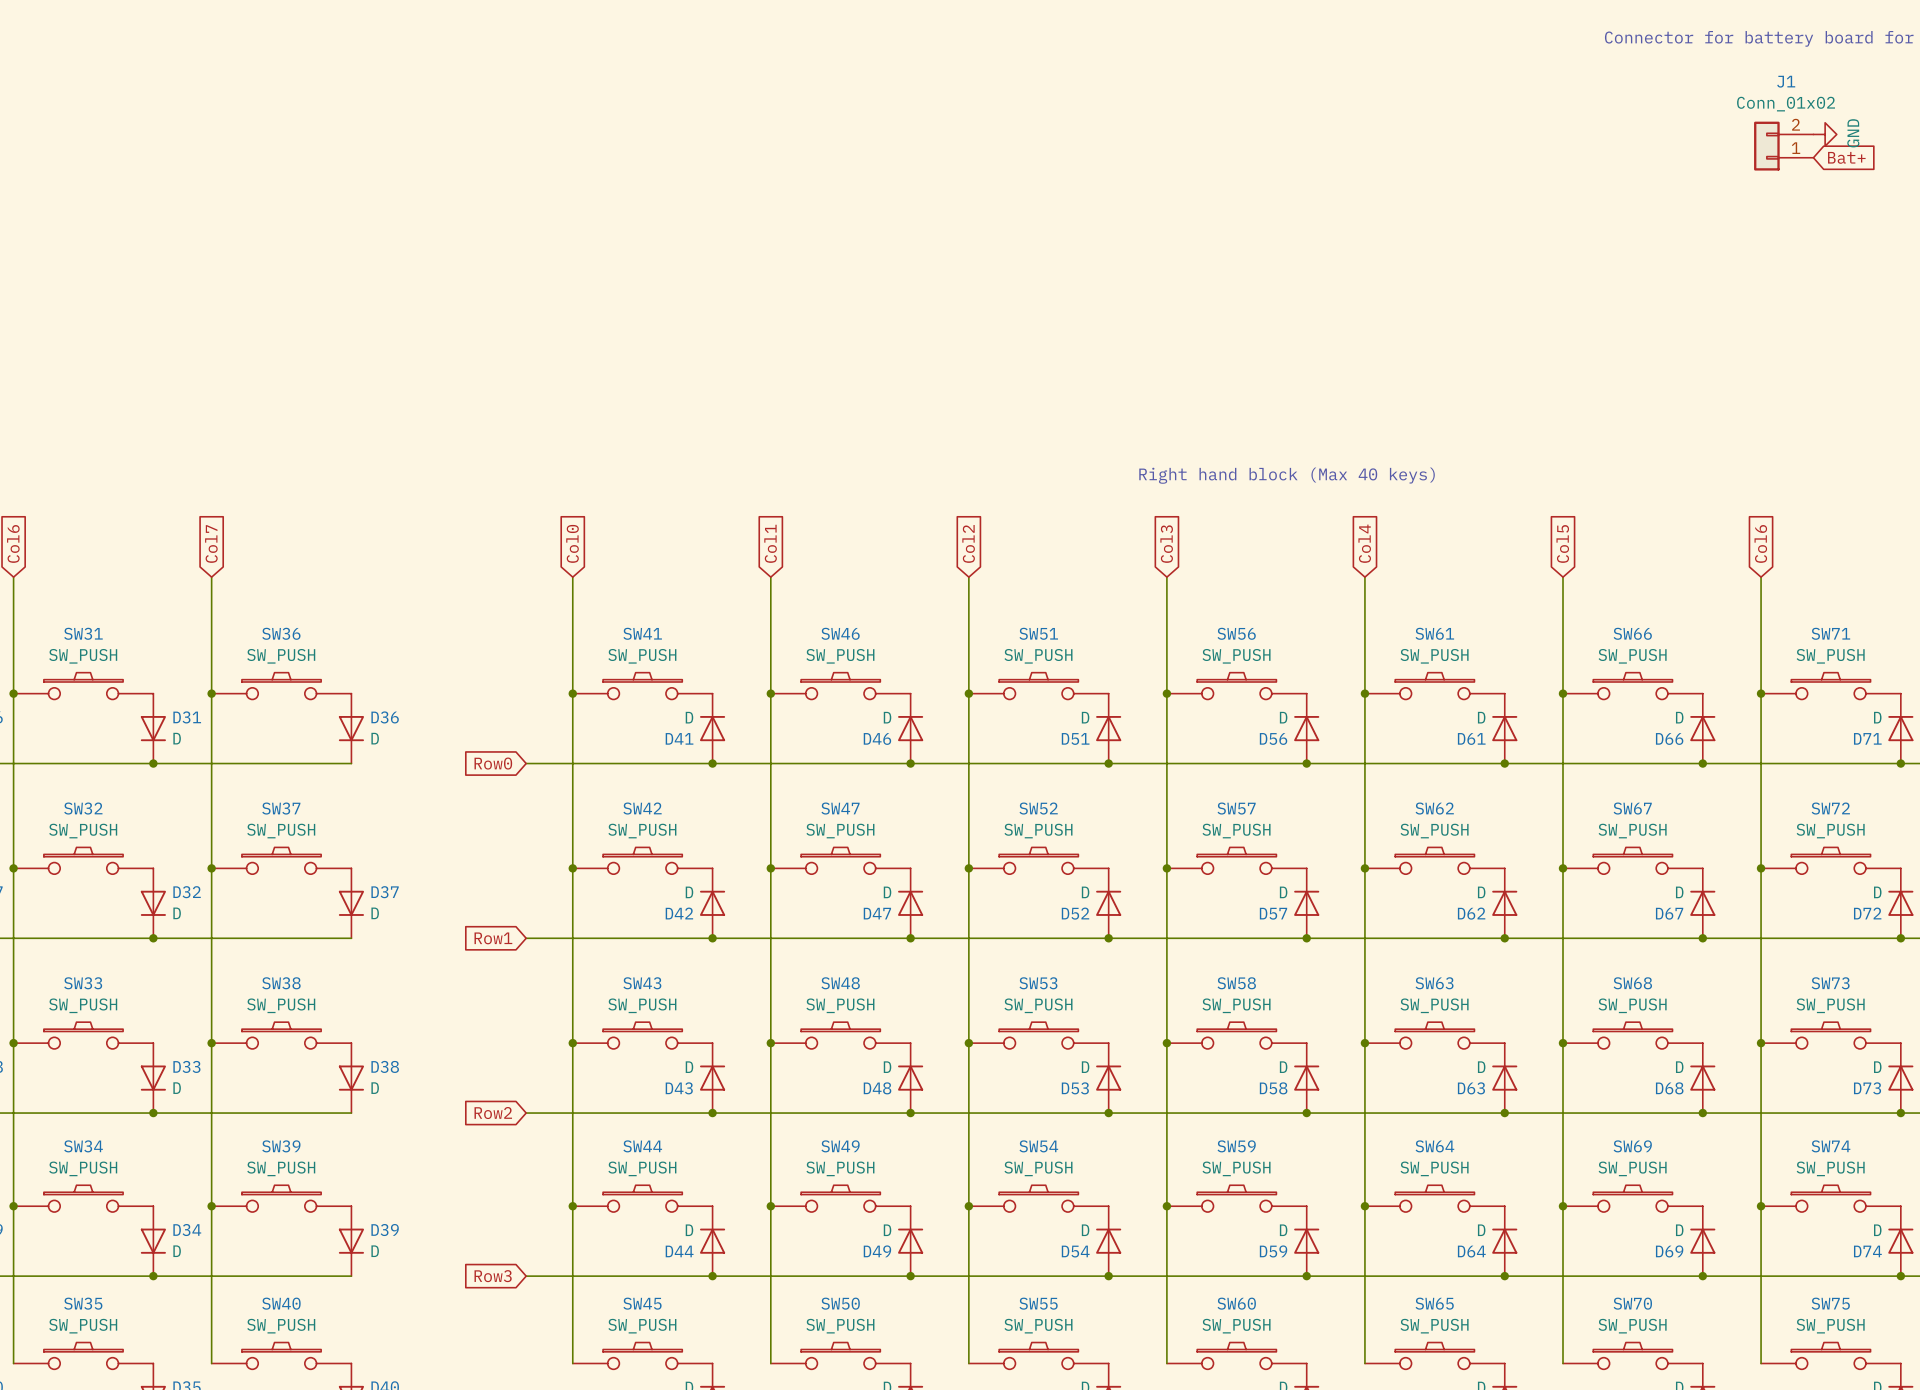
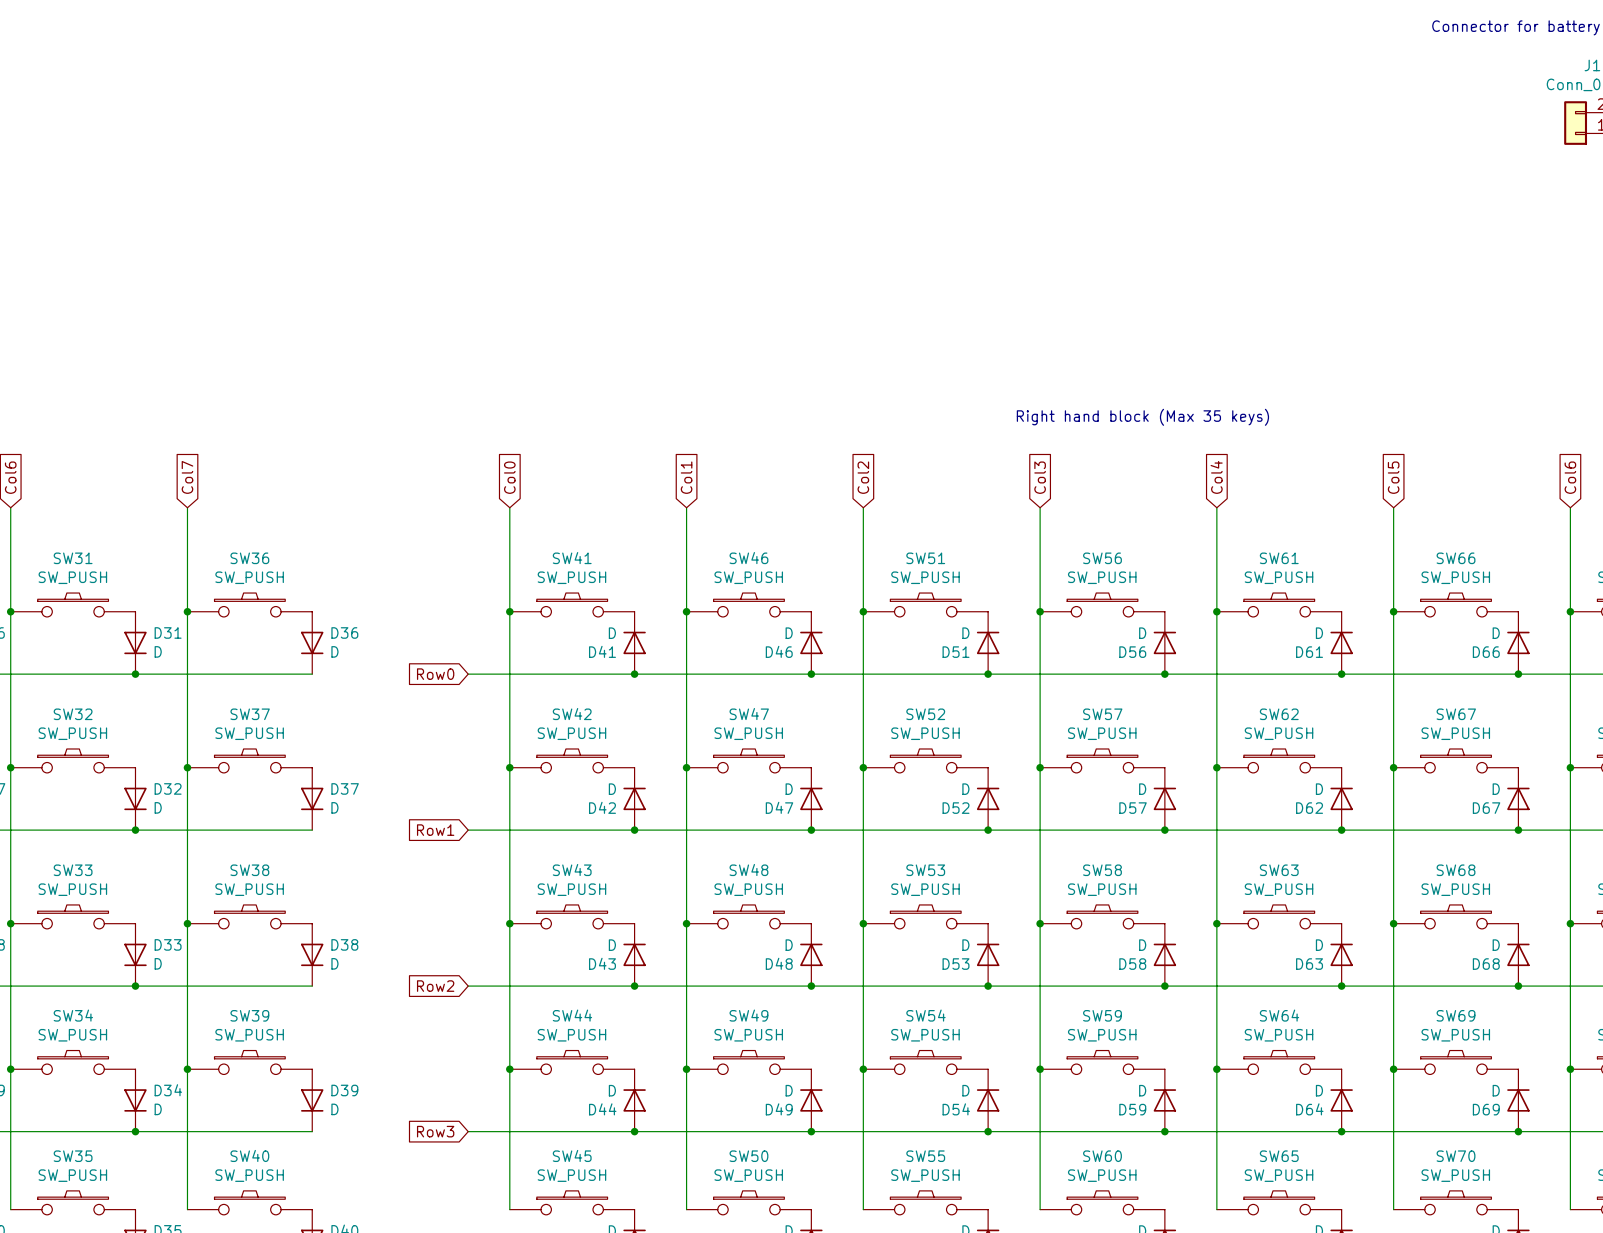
text: Right hand block (Max 40 keys) (1287, 475) -> Right hand block (Max 35 keys) (1142, 417)

